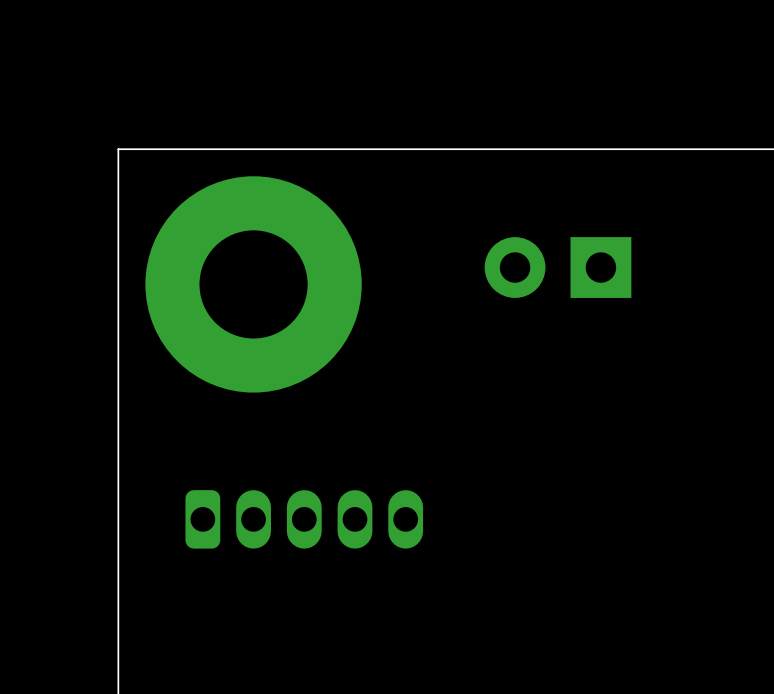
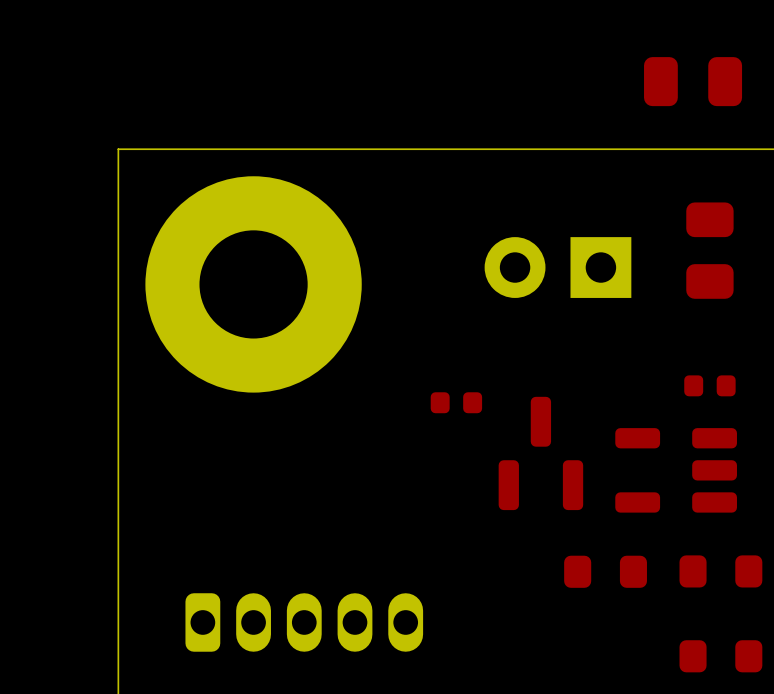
part: none -> (693, 81)
part: none -> (709, 250)
part: none -> (709, 385)
part: none -> (456, 402)
part: none -> (540, 453)
part: none -> (676, 470)
part position: (304, 519) -> (304, 622)
part: none -> (605, 571)
part: none -> (720, 571)
part: none -> (720, 656)

